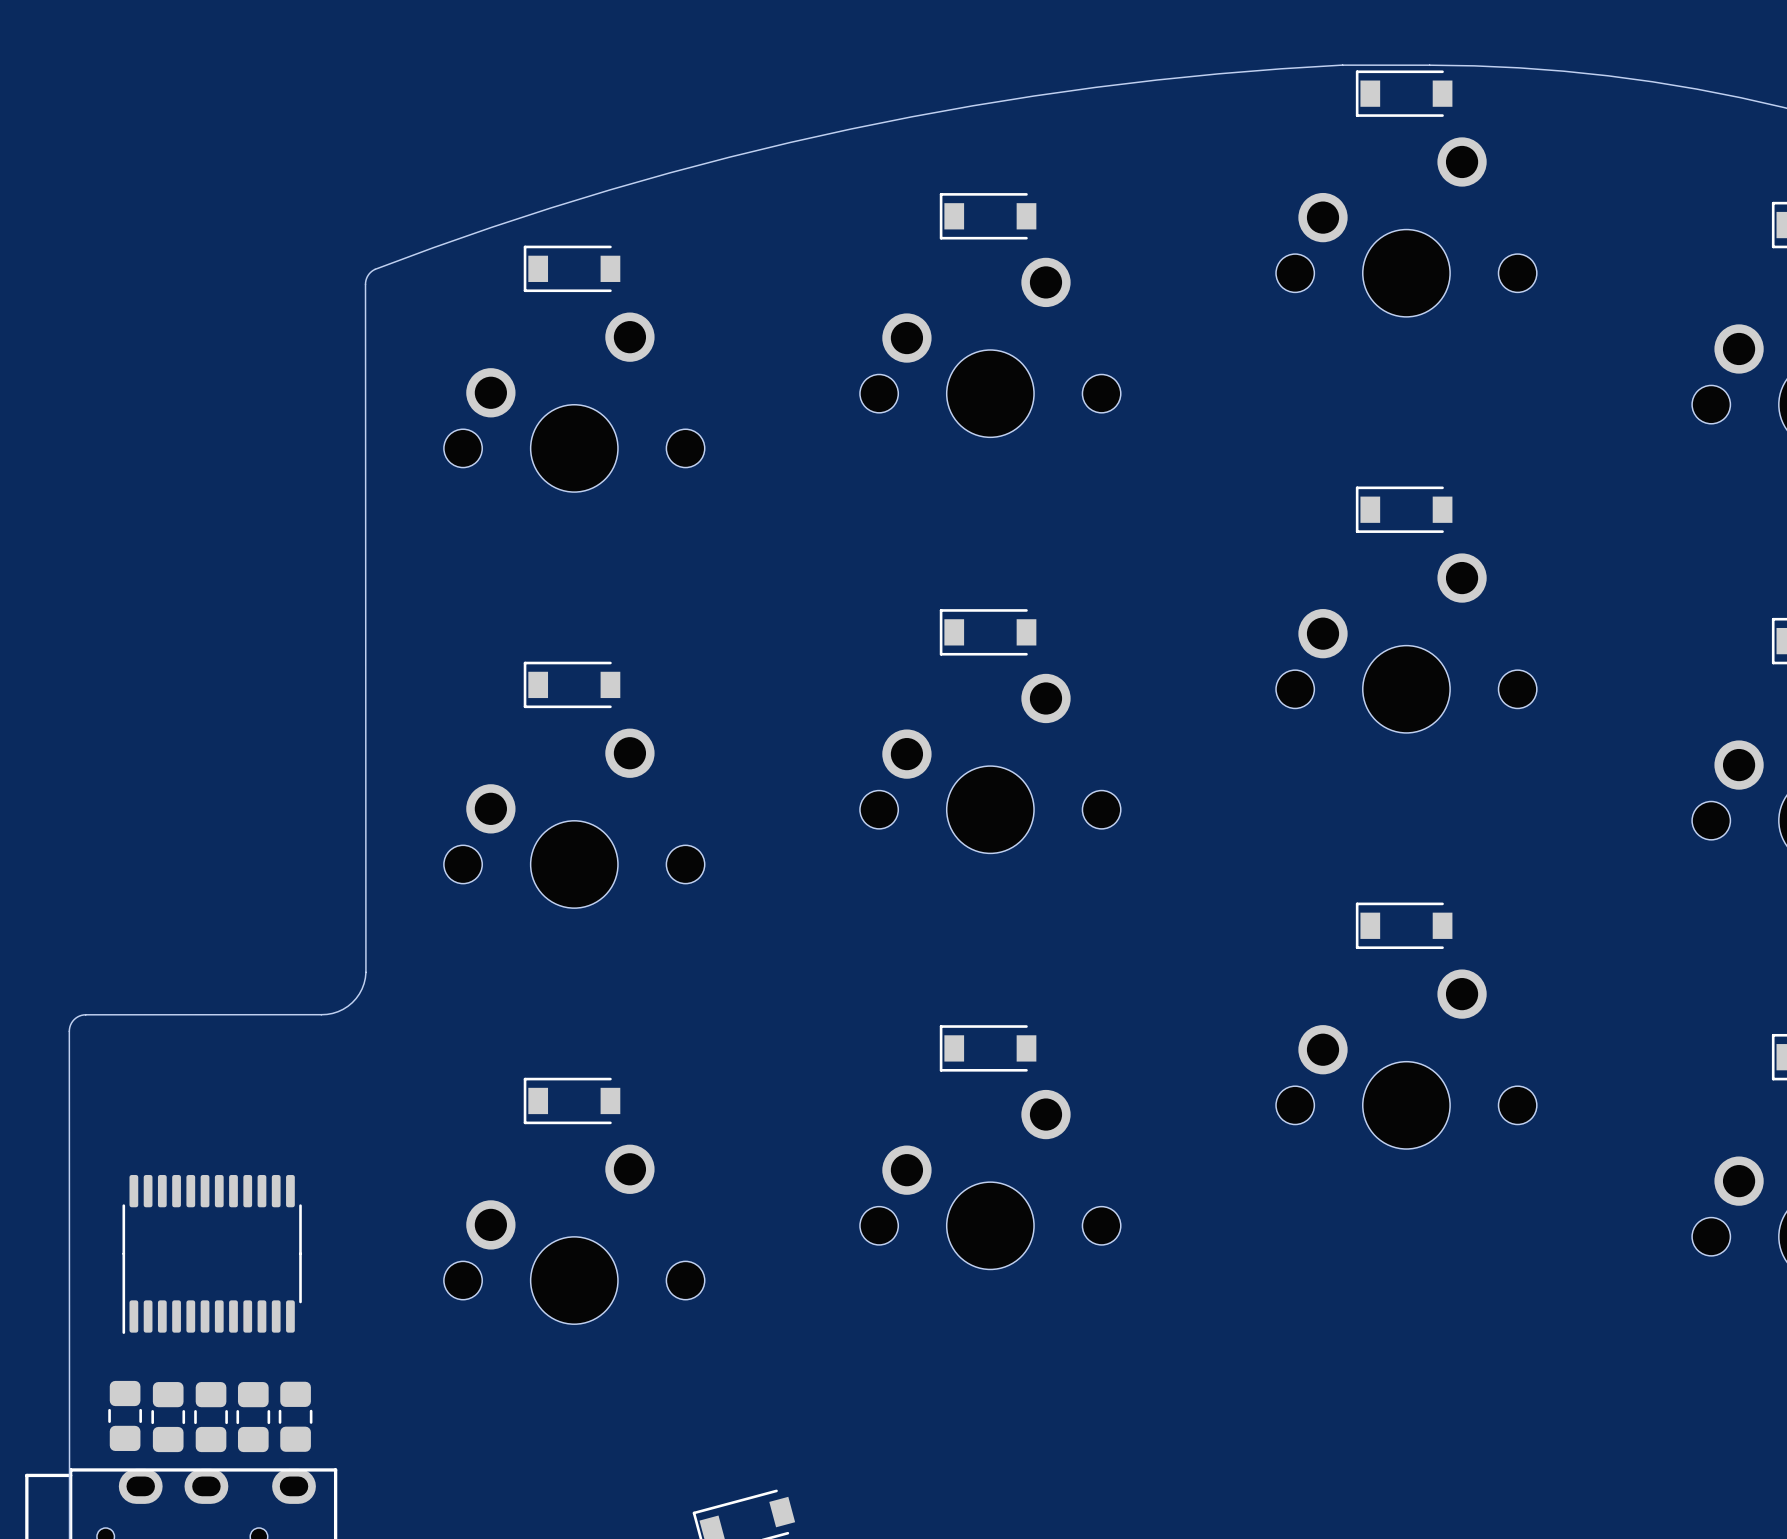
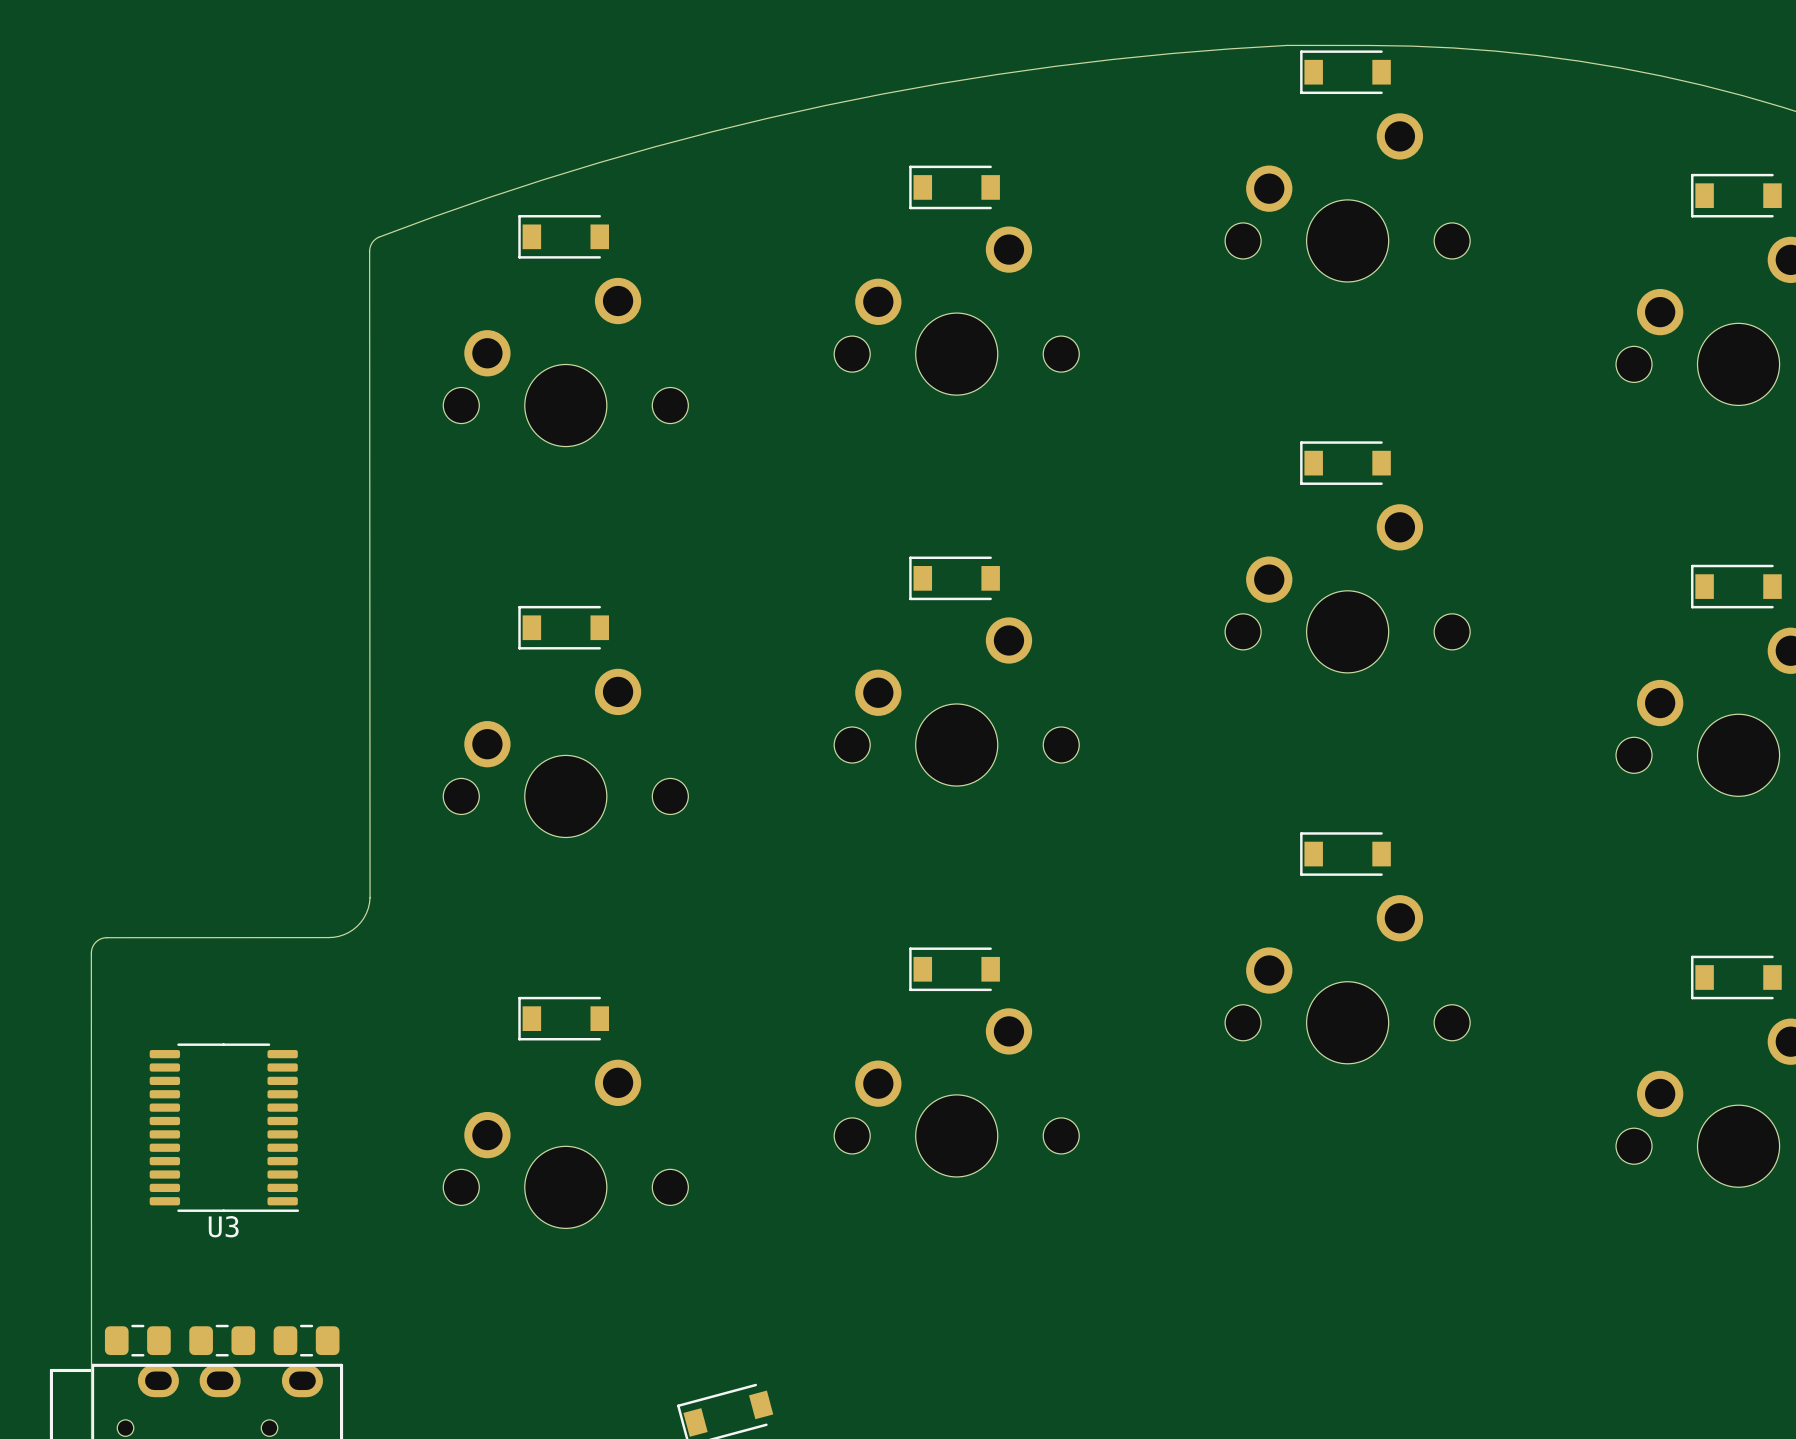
U3: none -> (224, 1127)
part: (212, 1254) -> none
part: (125, 1415) -> none
part: (295, 1416) -> none
part: (168, 1417) -> none
part: (211, 1417) -> none
part: (253, 1417) -> none
part: none -> (137, 1340)
part: none -> (222, 1340)
part: none -> (306, 1340)

